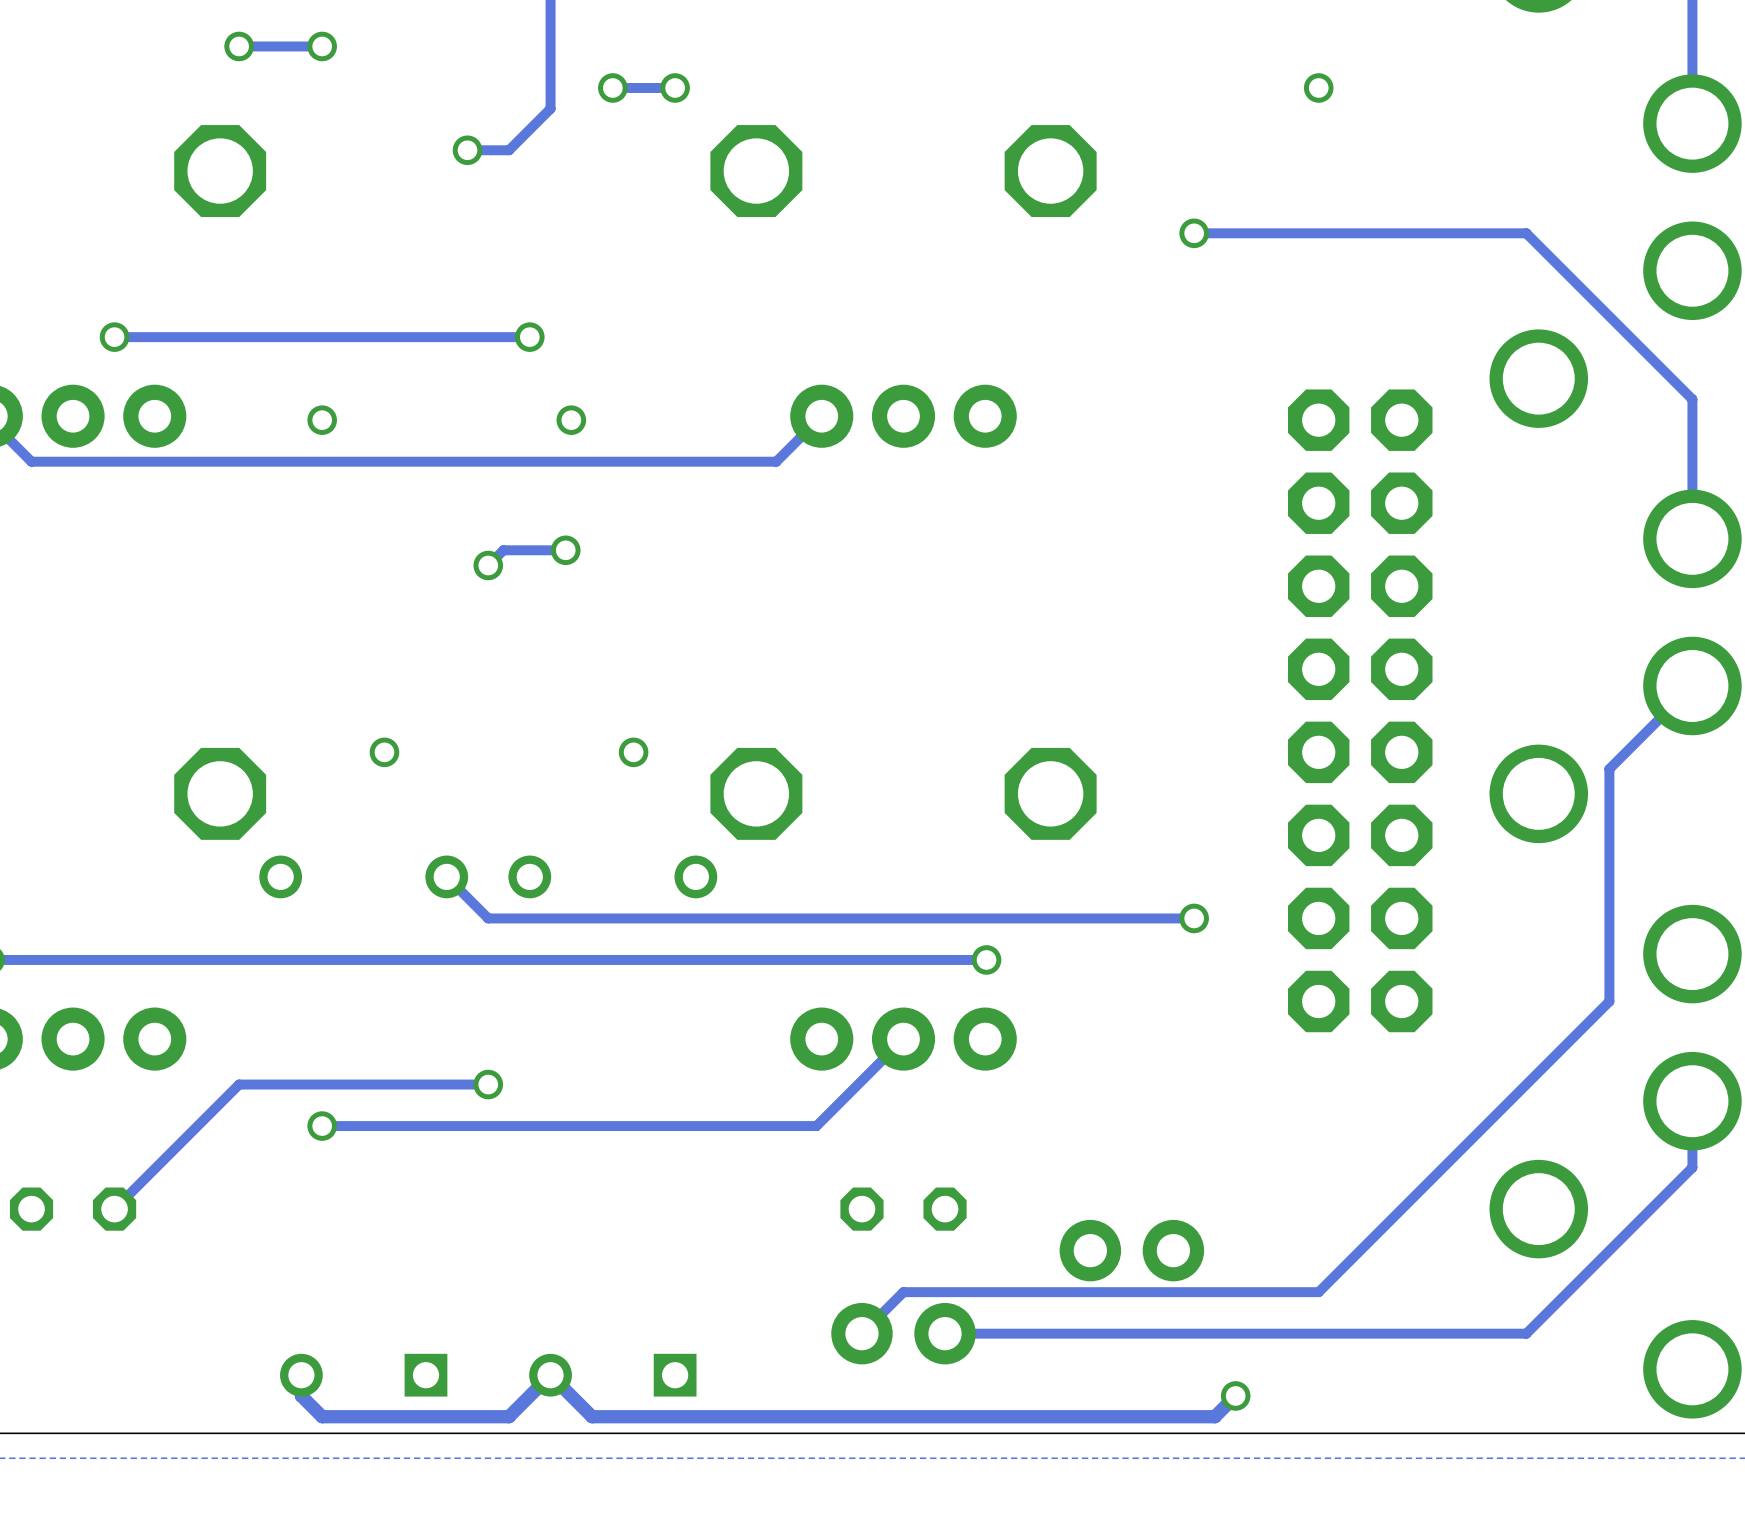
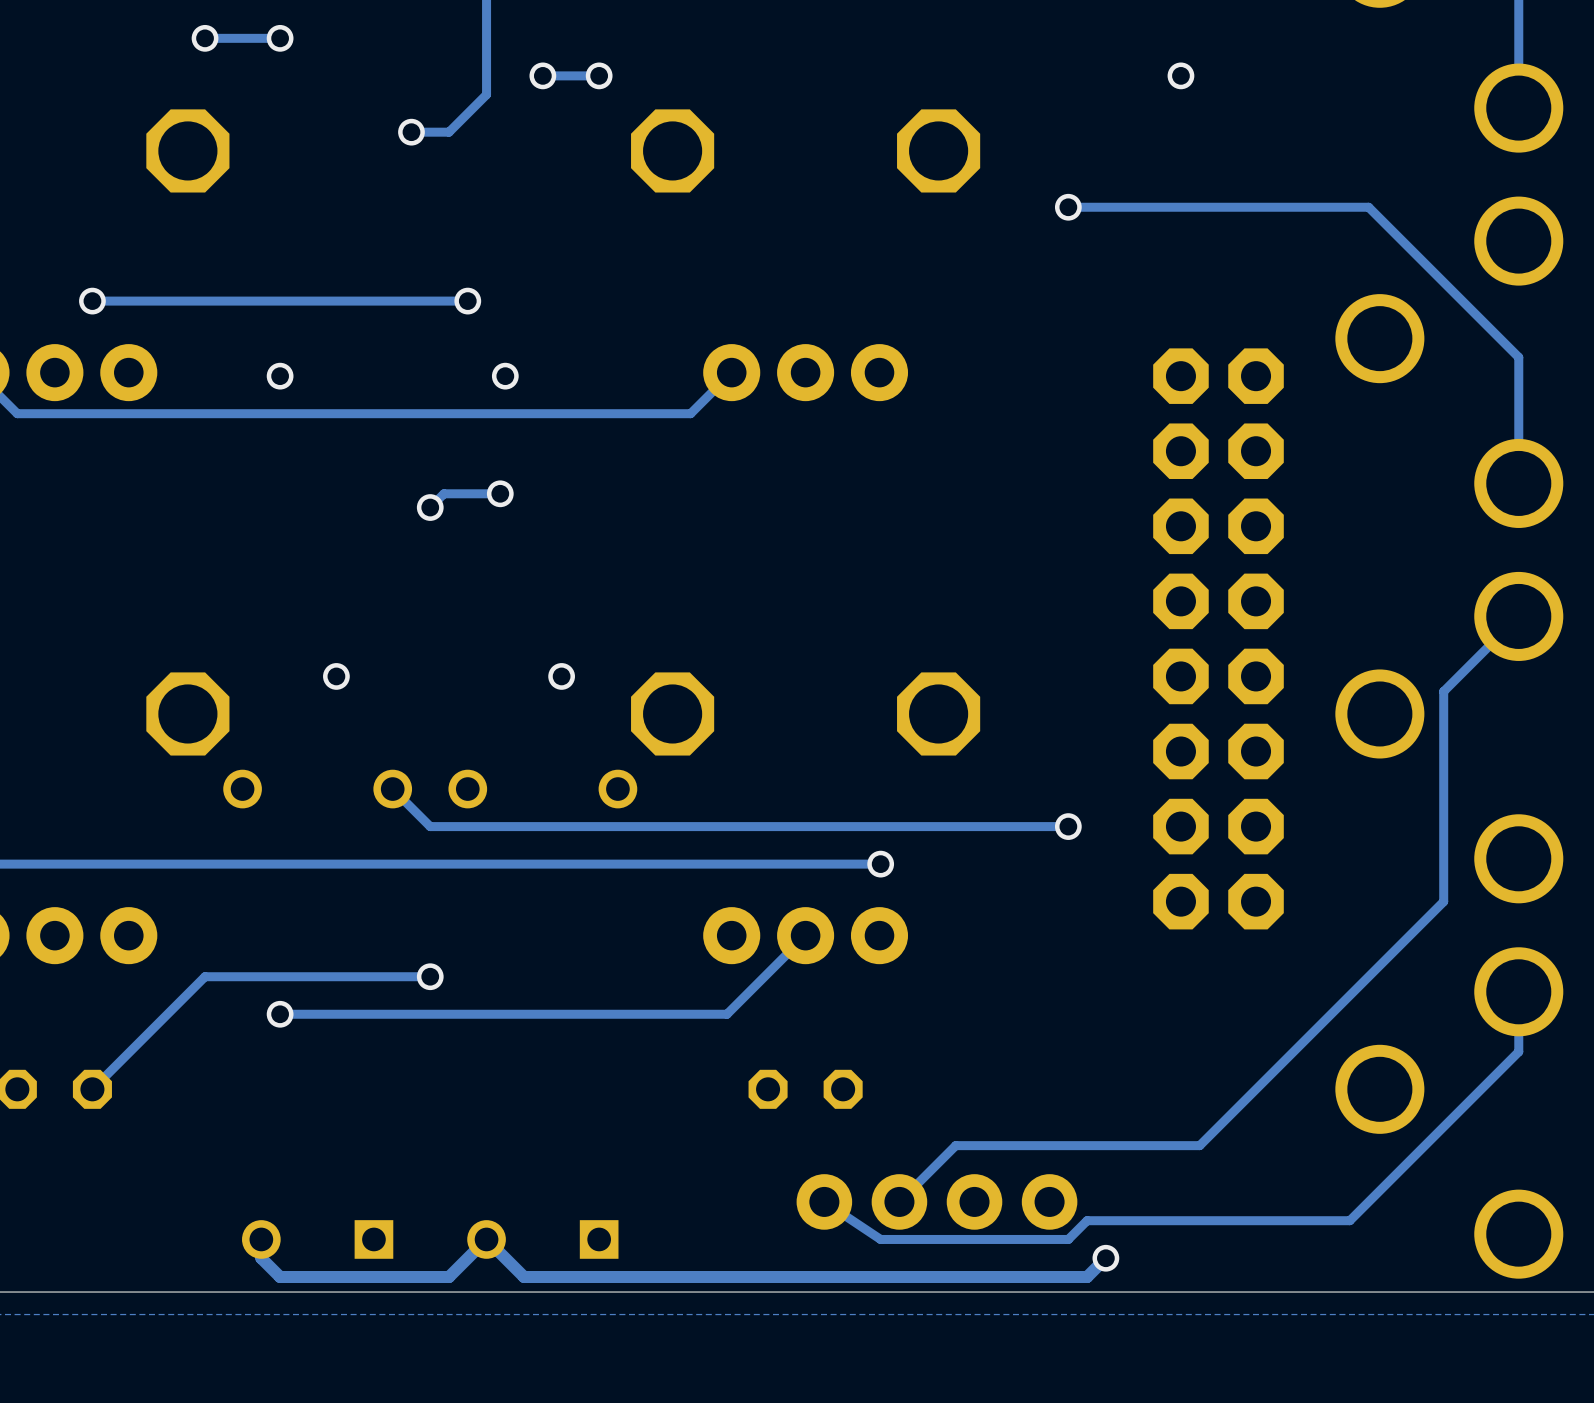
part position: (1131, 1250) -> (1012, 1201)
track: (1339, 1271) (1318, 1292) (903, 1292) (861, 1333) -> (1199, 1145) (955, 1145) (899, 1201)
part position: (903, 1333) -> (861, 1201)
track: (1526, 1333) (945, 1333) -> (1368, 1201) (1349, 1220) (1087, 1220) (1068, 1239) (880, 1239) (824, 1201)

